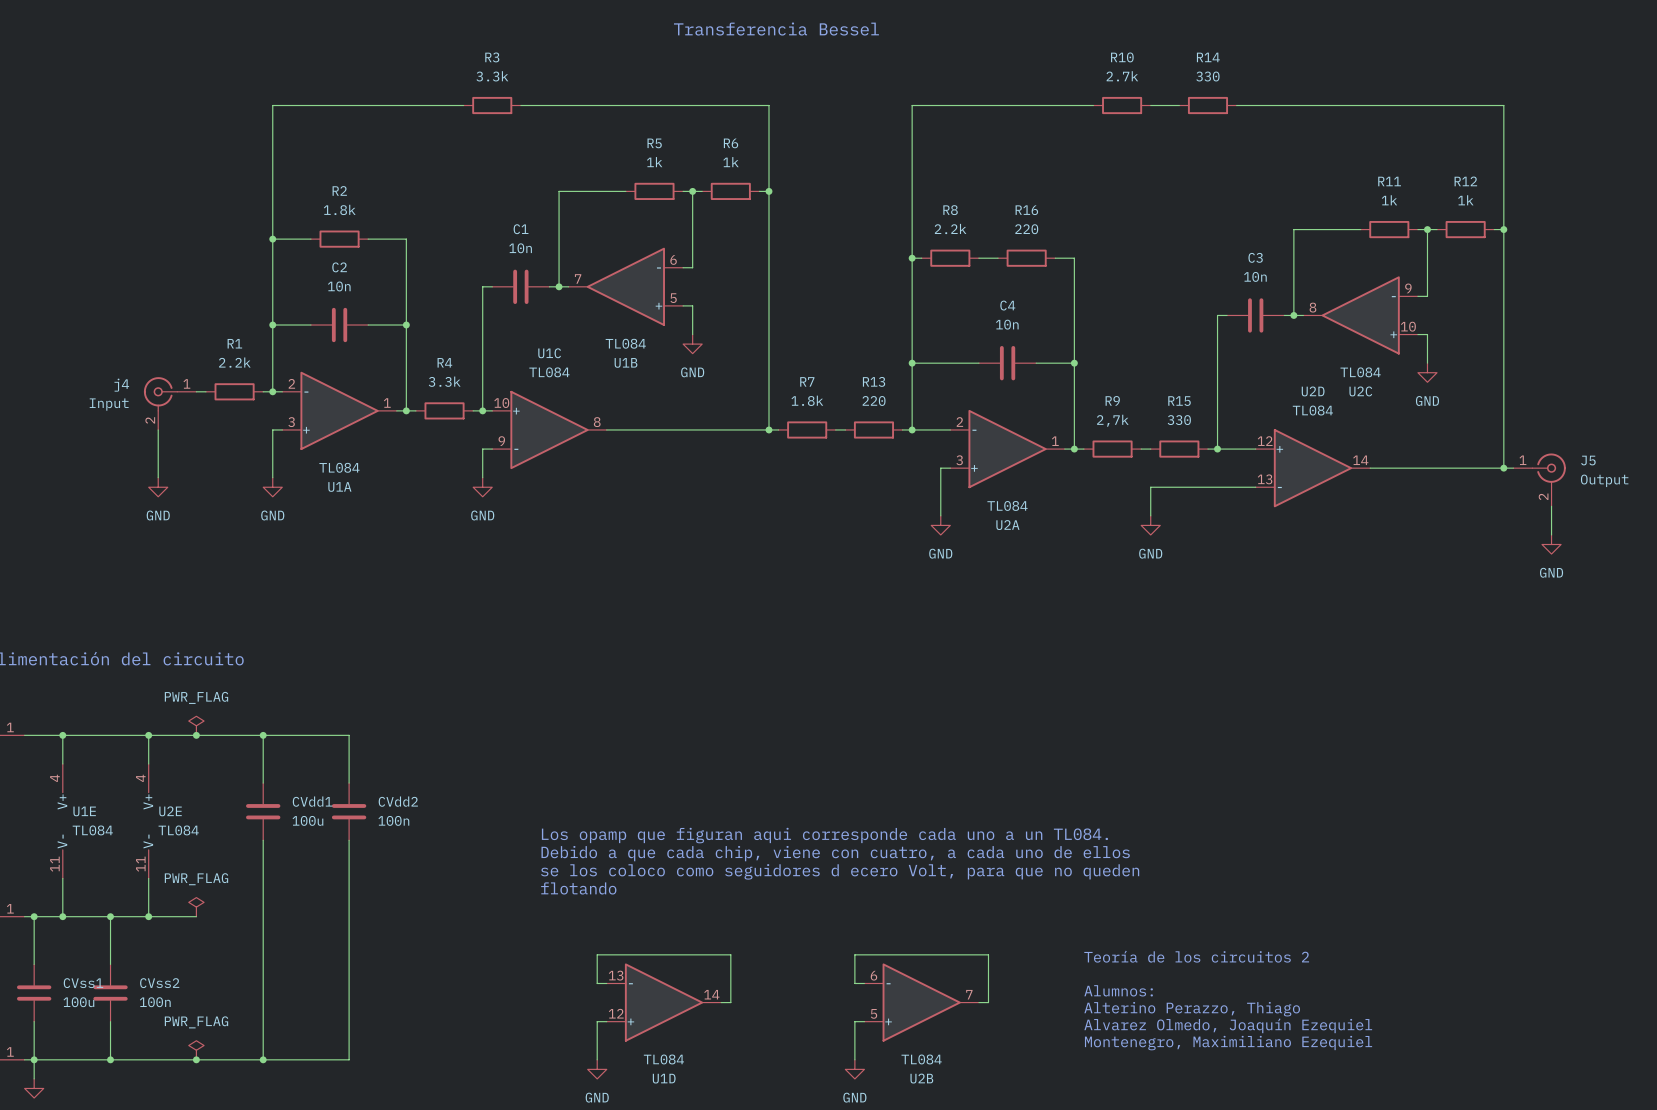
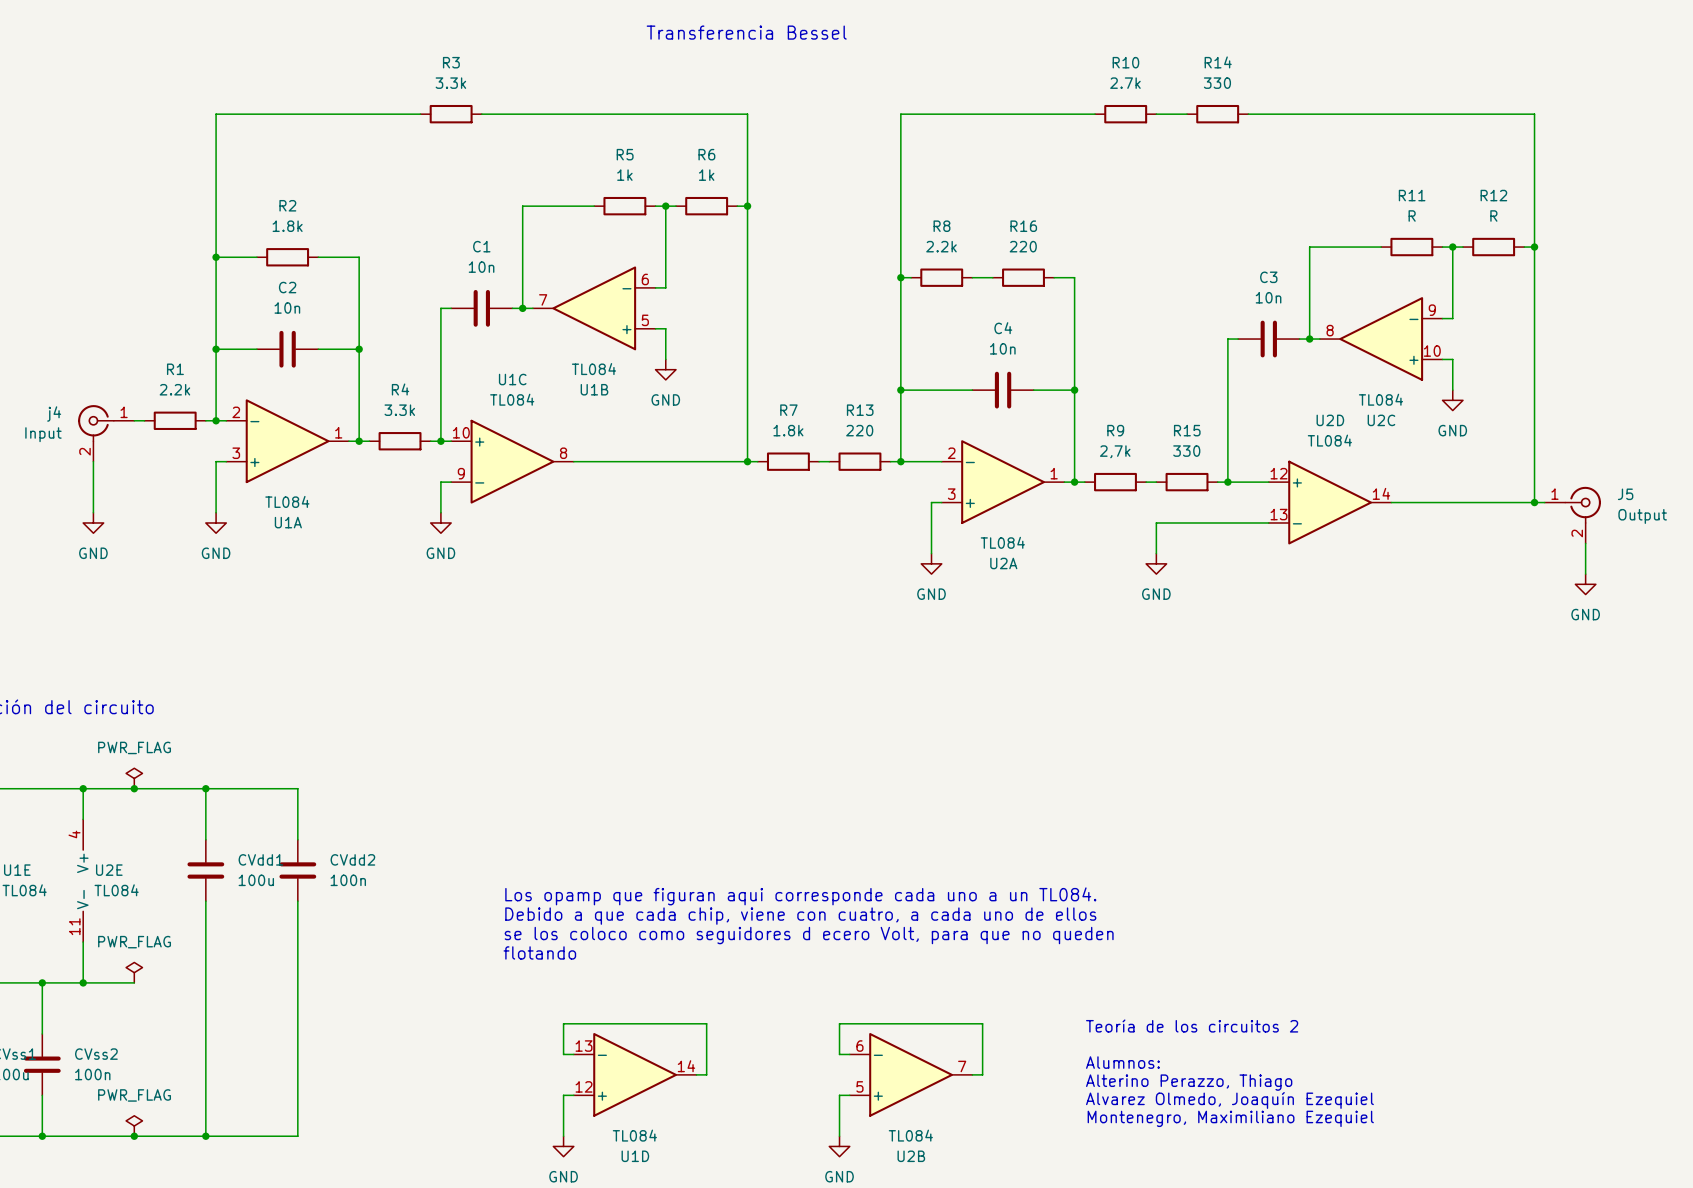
R11 value: 1k (1389, 200) -> R (1412, 215)
R12 value: 1k (1465, 200) -> R (1493, 215)

